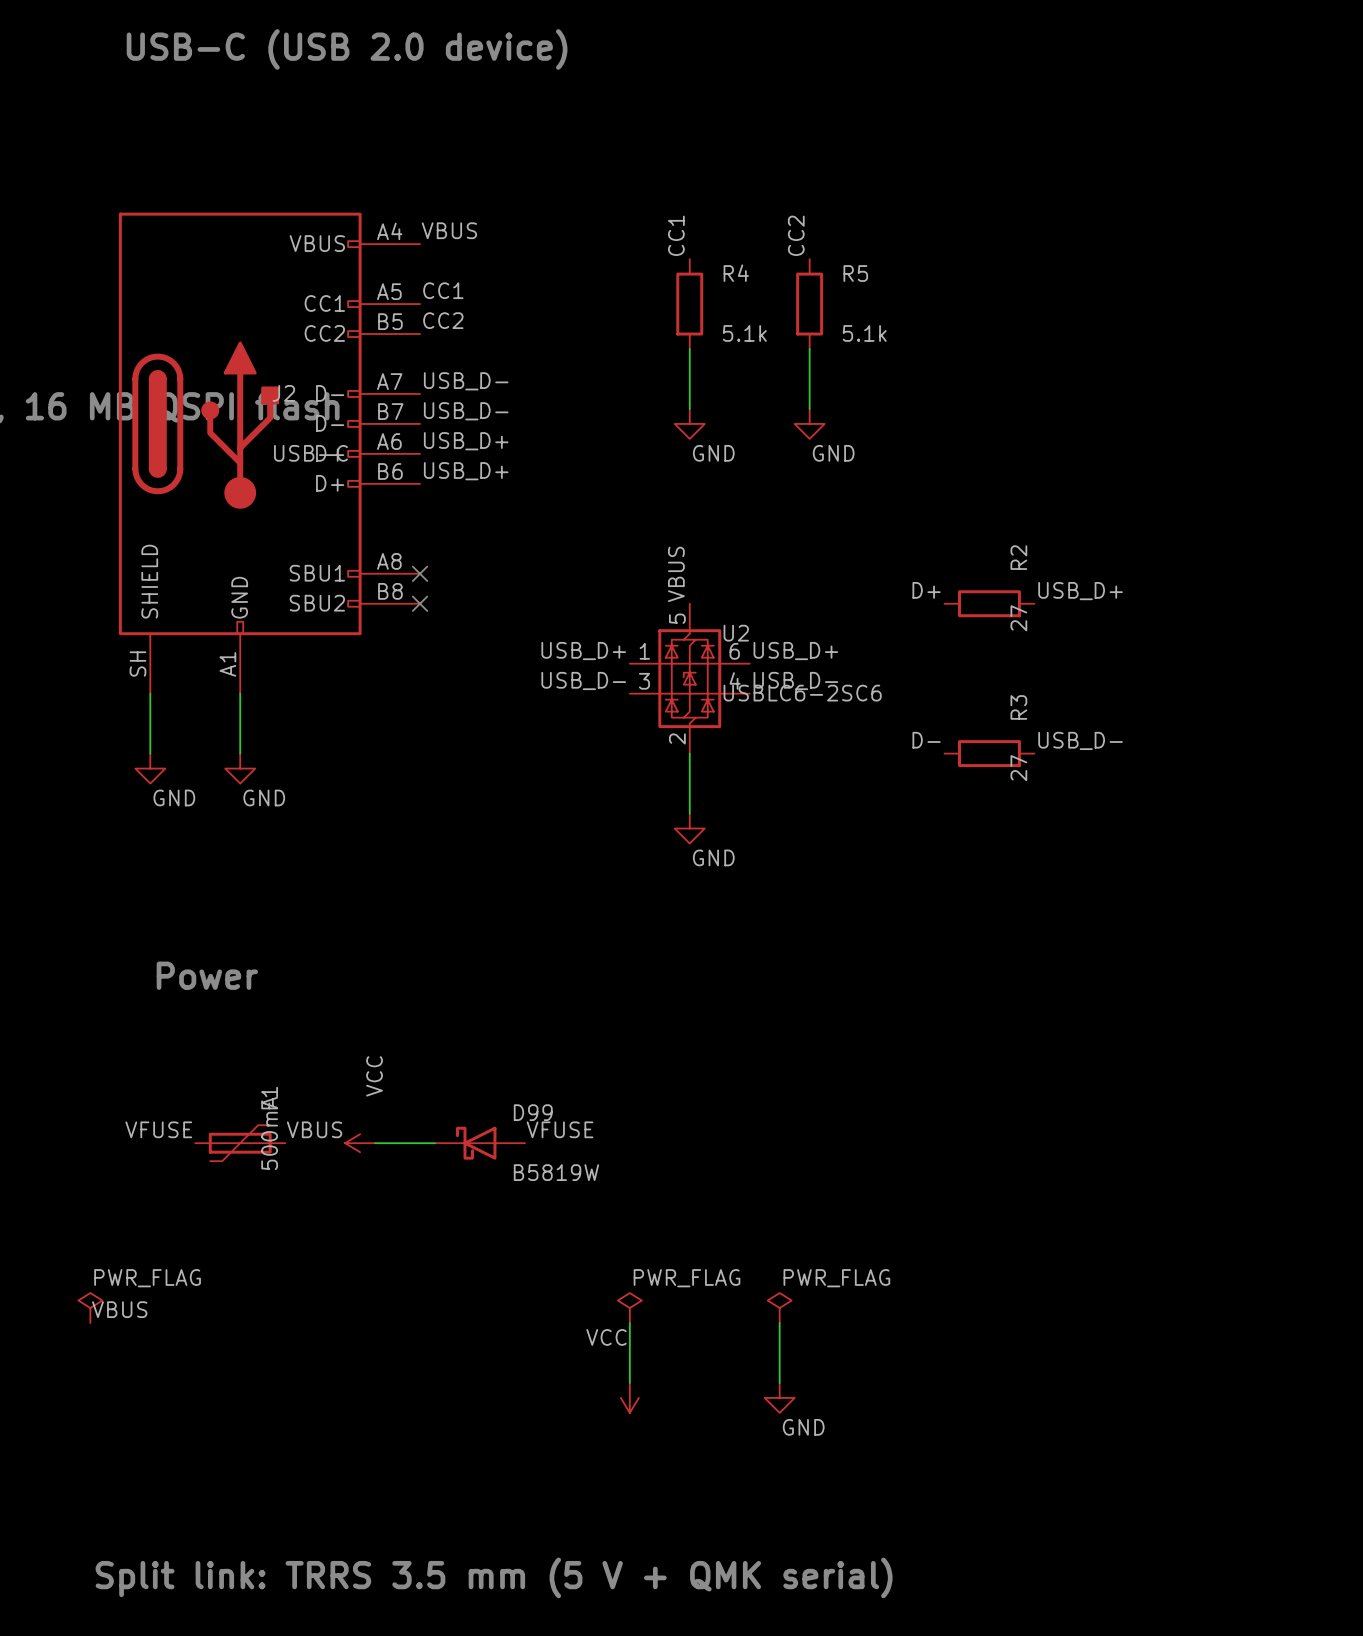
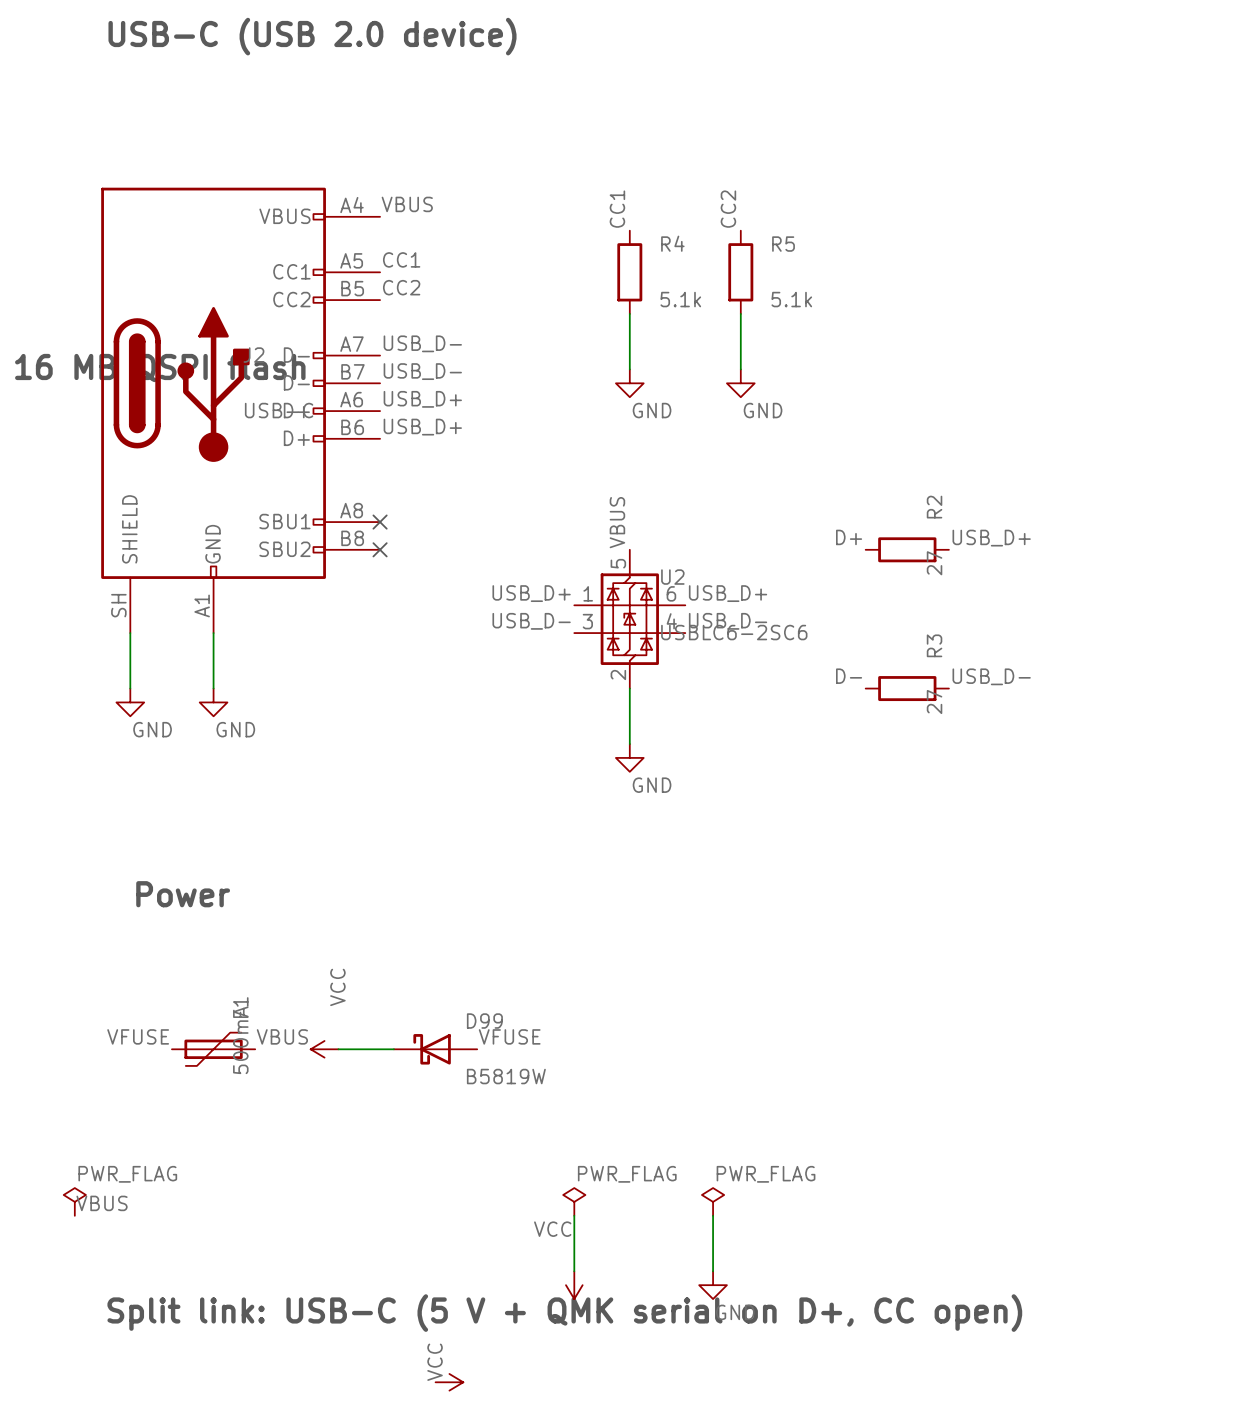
text: none -> Split link: USB-C (5 V + QMK serial on D+, CC open) (564, 1313)
power symbol: none -> VCC (449, 1382)

